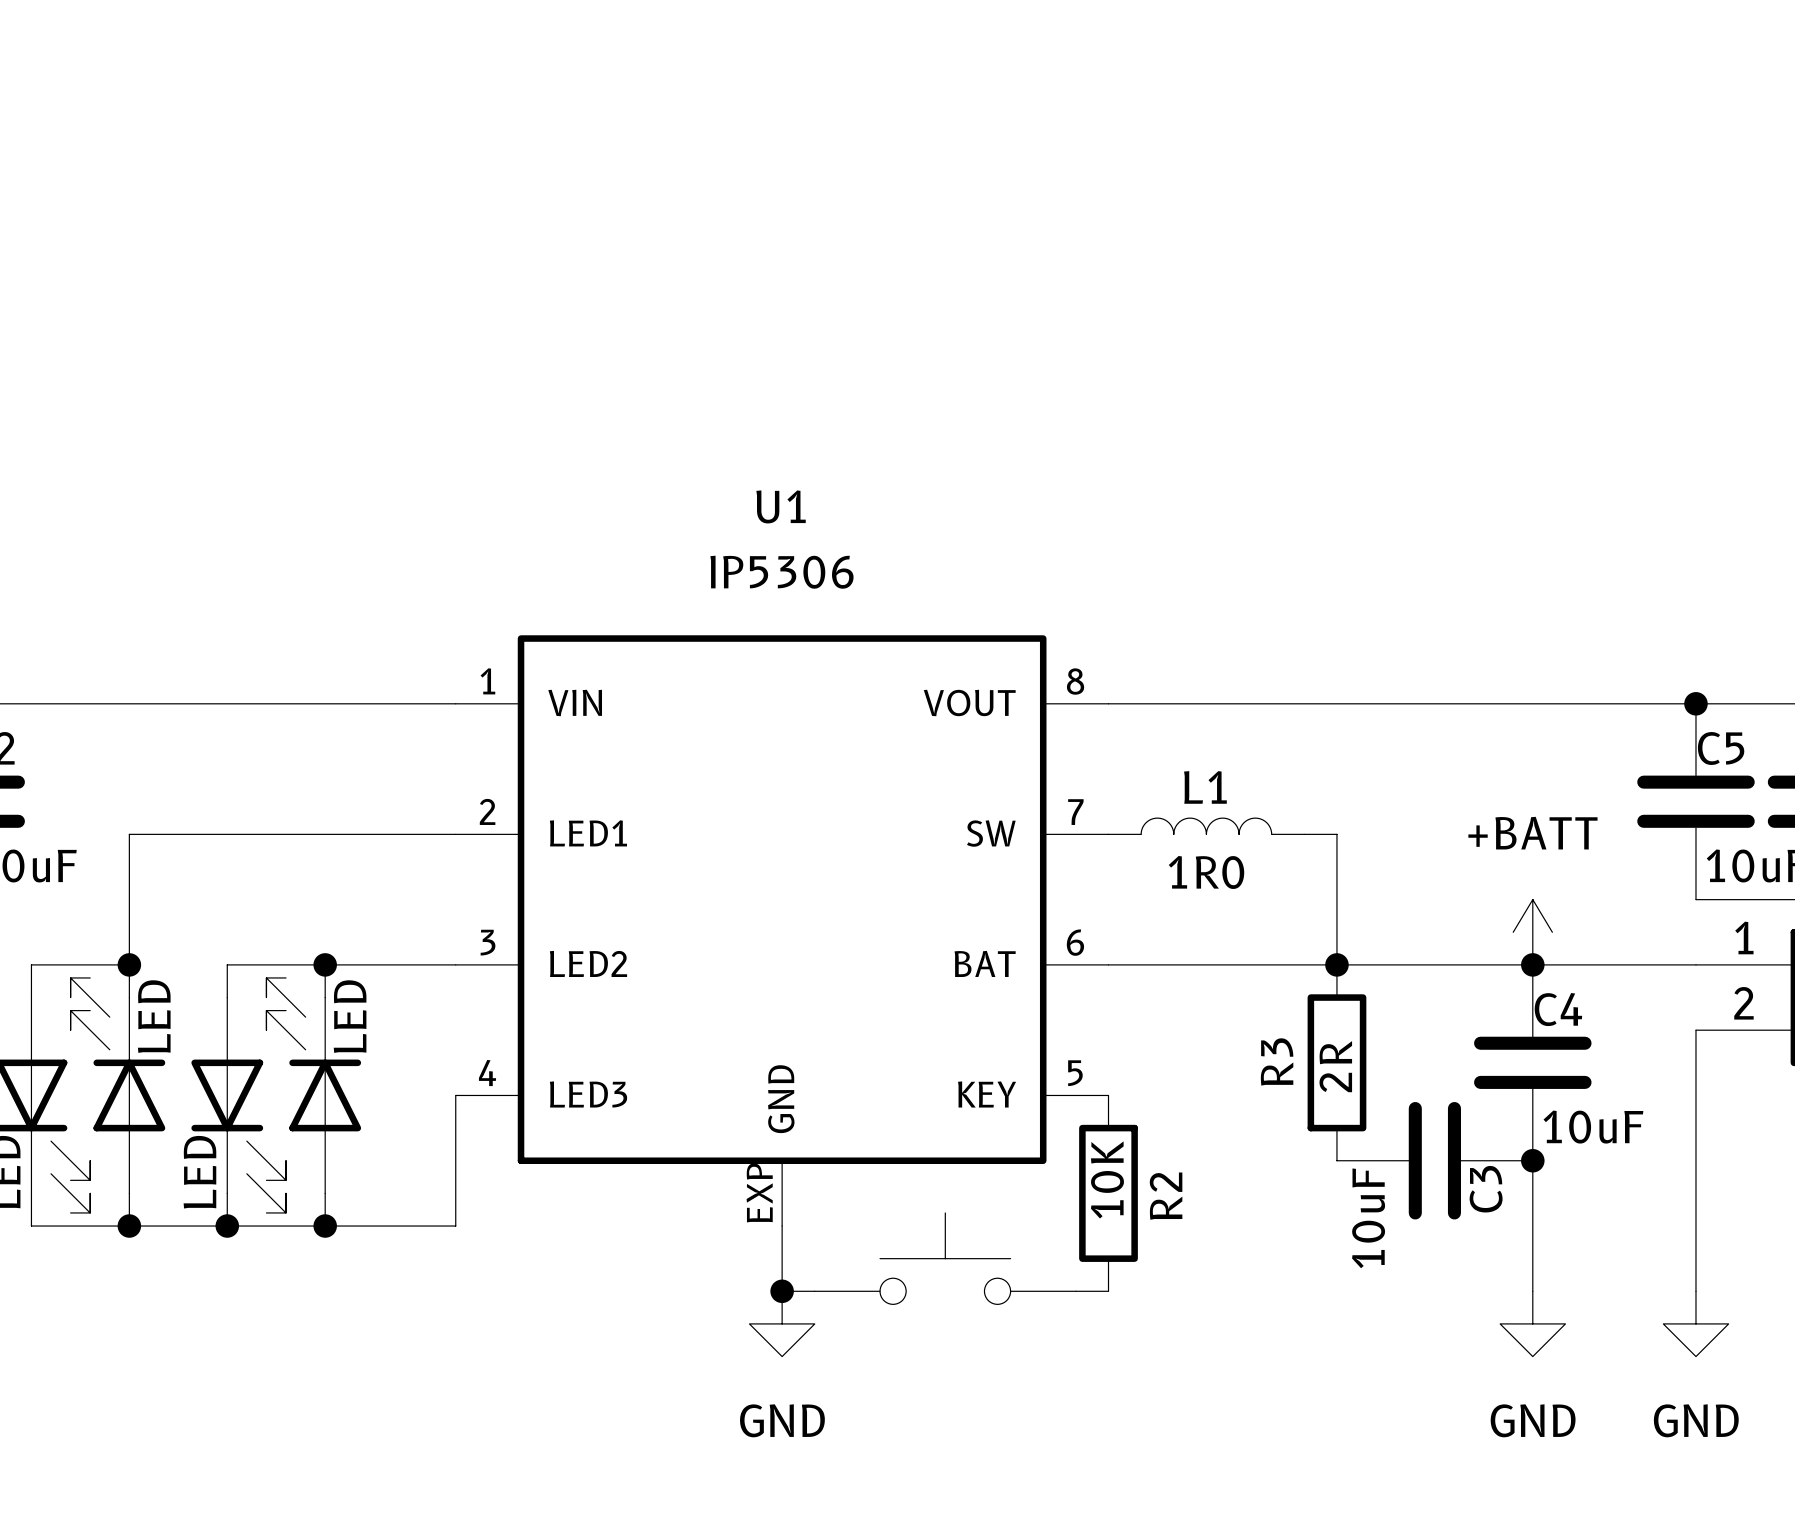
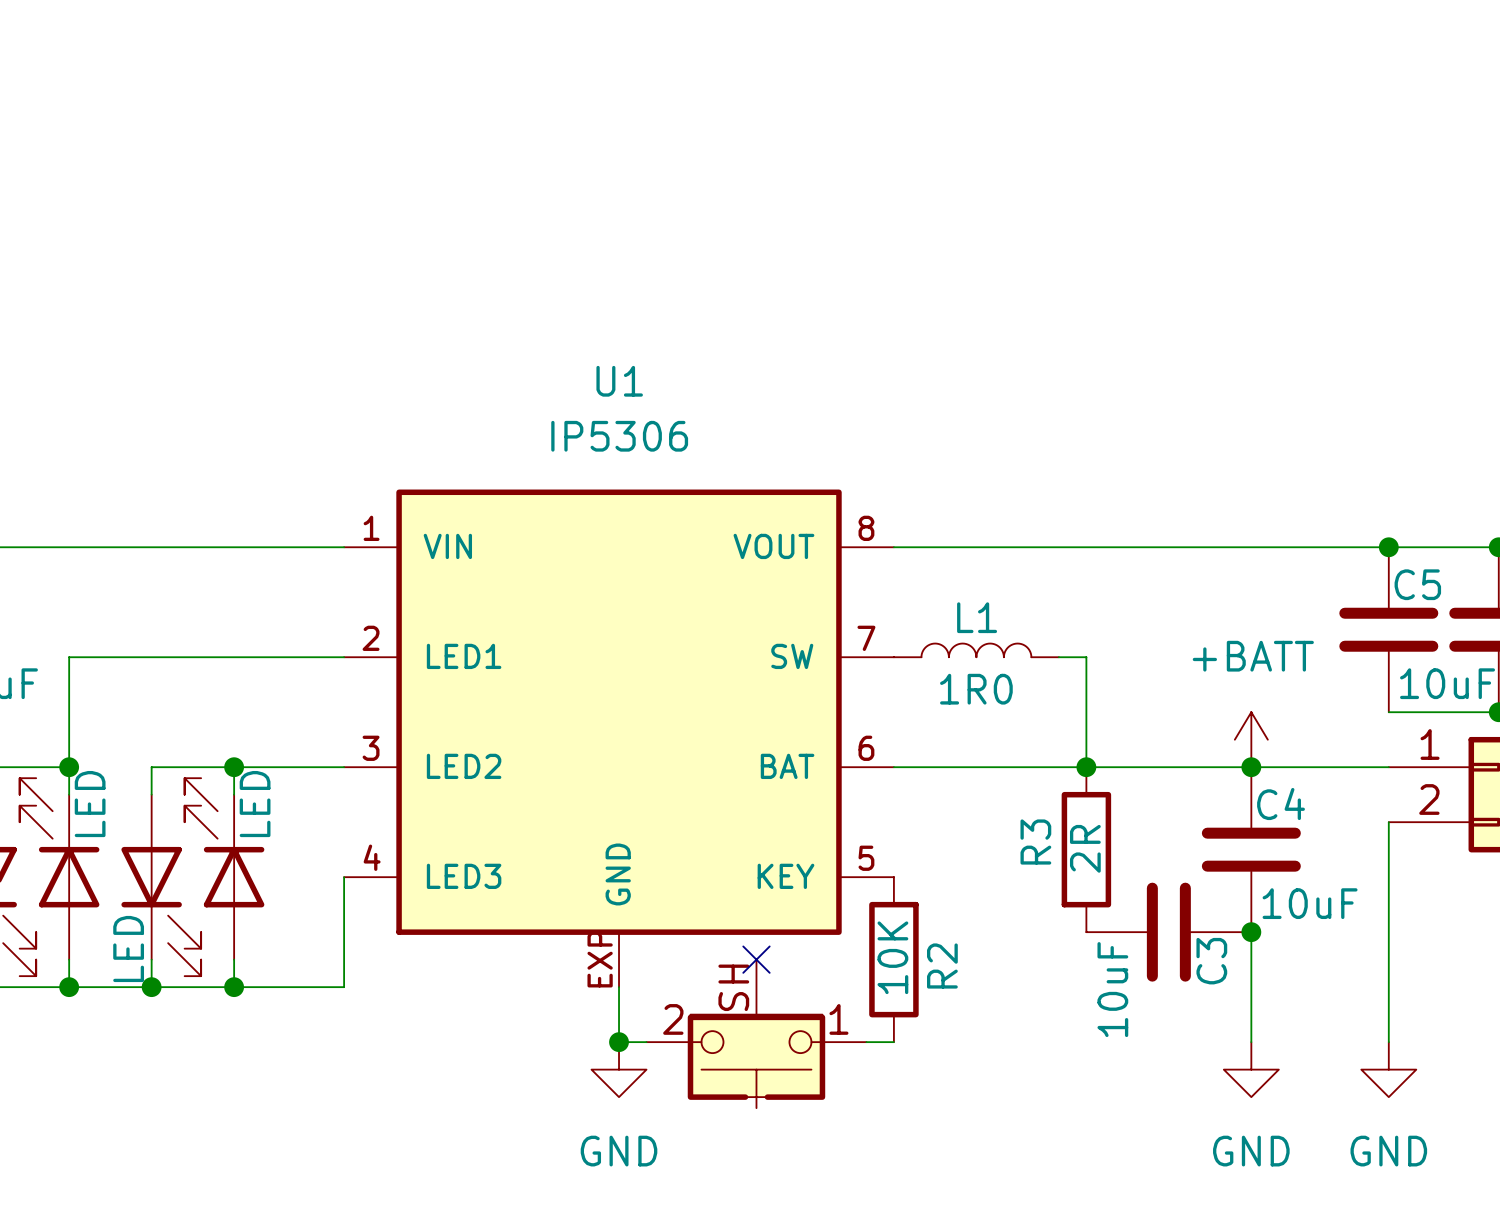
no-connect mark: none -> (756, 959)
part symbol: [814, 1212, 1076, 1305] -> [646, 959, 867, 1109]

